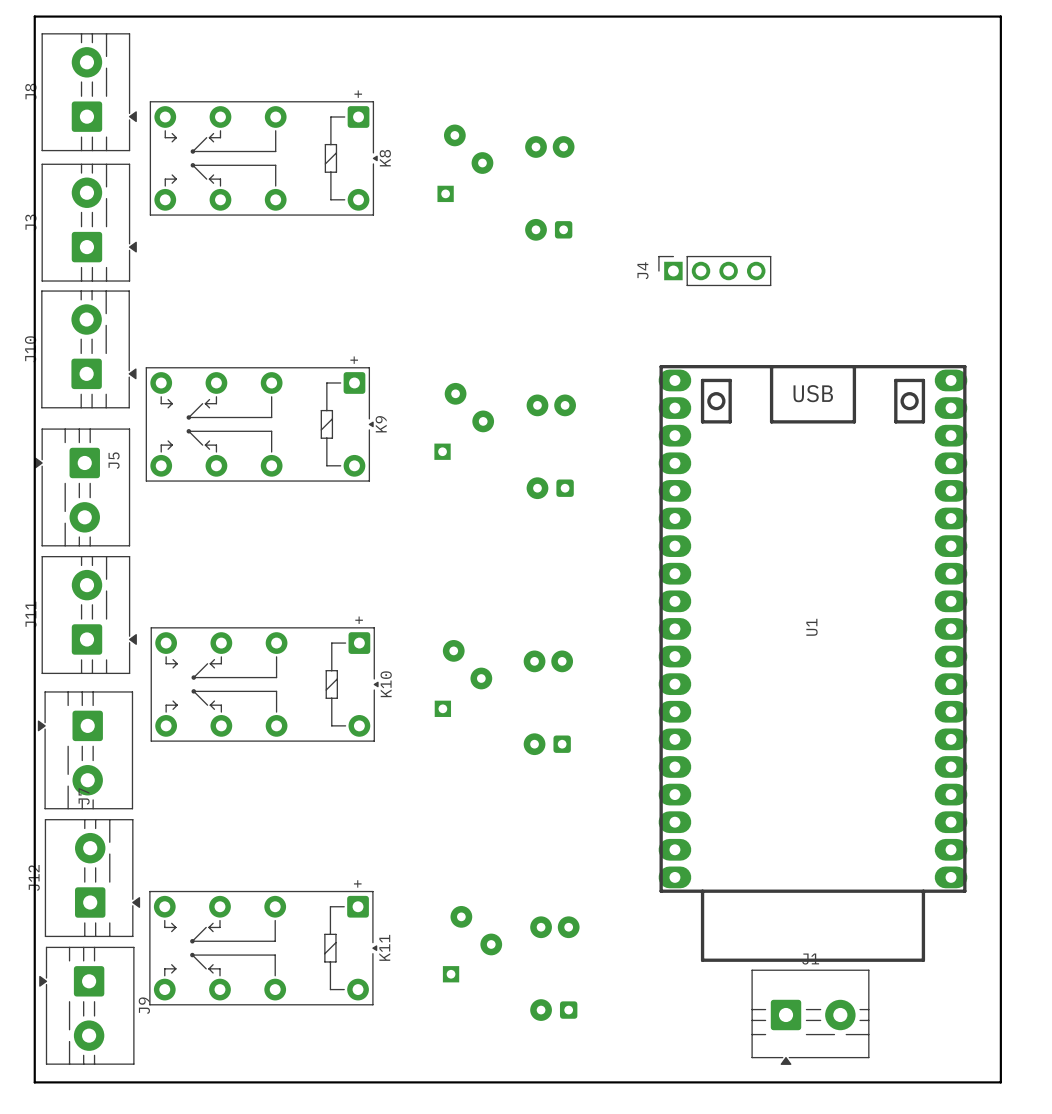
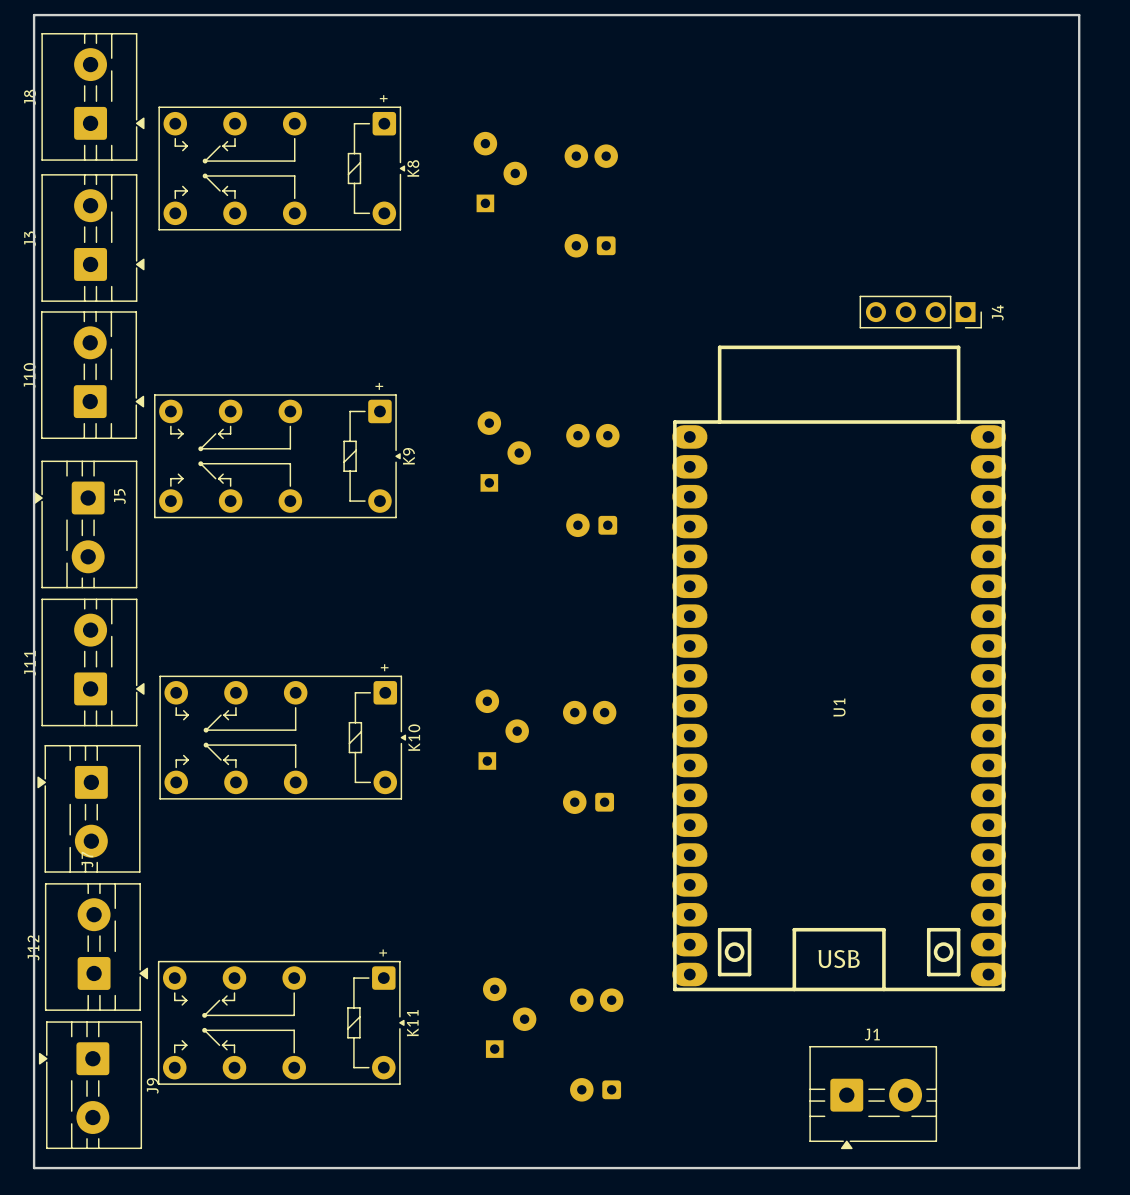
part footprint: [437, 124, 494, 203] -> [473, 131, 528, 213]
J4 rotation: 0° (714, 271) -> 180° (920, 312)
J4 position: (714, 271) -> (920, 312)
part footprint: [434, 382, 495, 460] -> [477, 411, 531, 492]
part footprint: [434, 640, 493, 717] -> [475, 689, 529, 770]
U1 rotation: 0° (812, 663) -> 180° (839, 668)
part footprint: [442, 905, 503, 983] -> [482, 977, 537, 1058]

